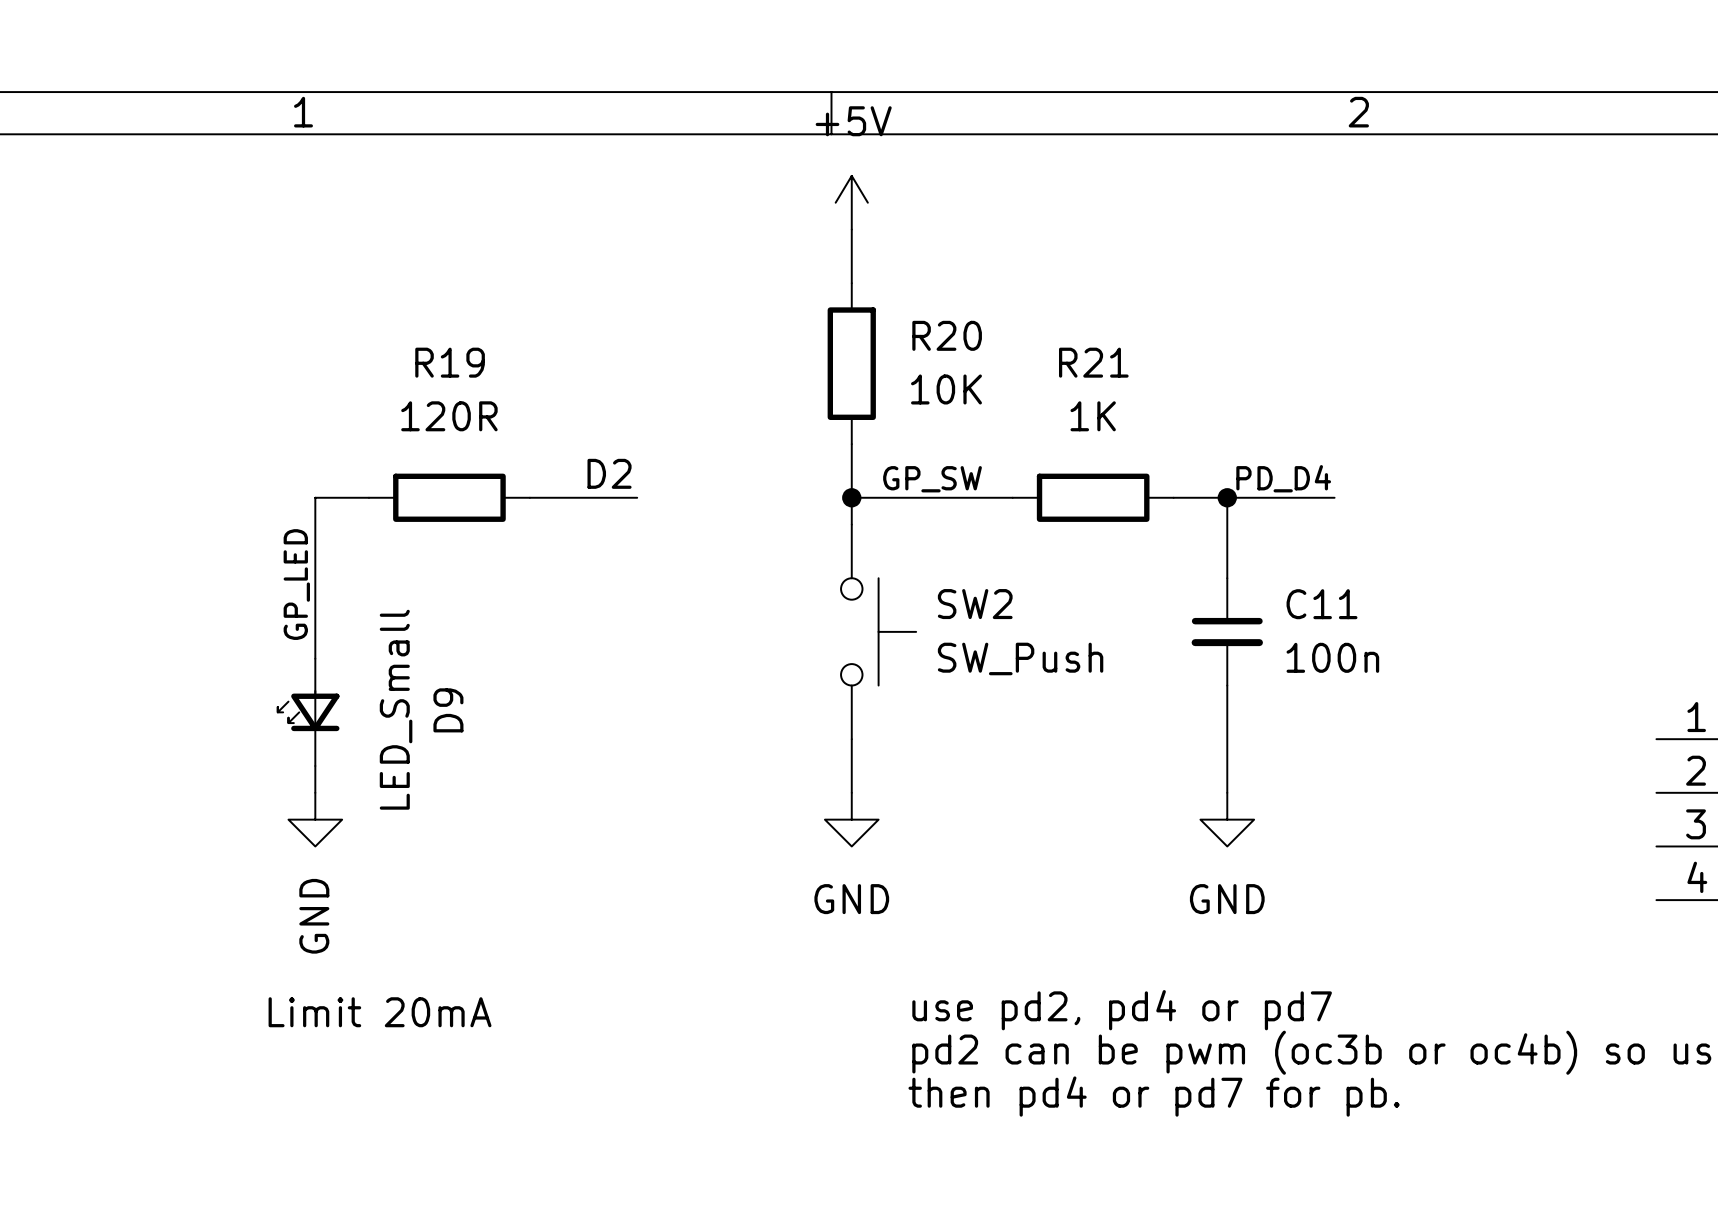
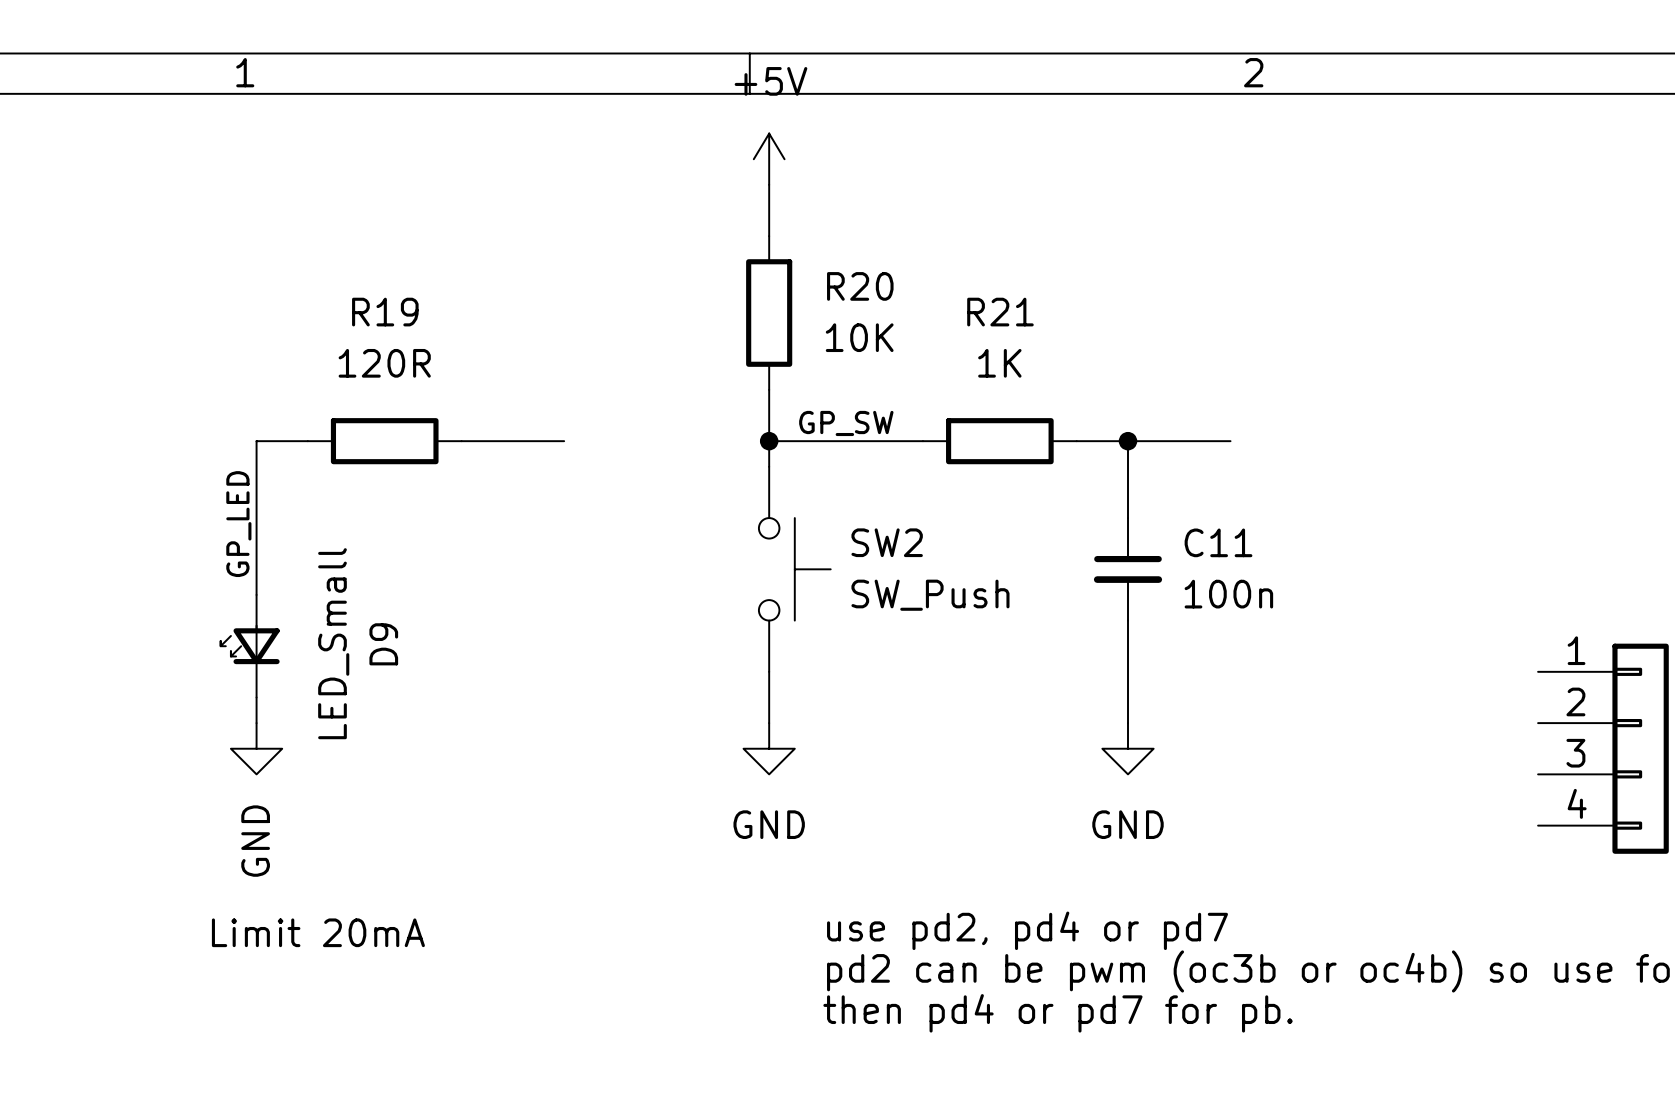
label: D2 (609, 473) -> none
label: PD_D4 (1283, 478) -> none

